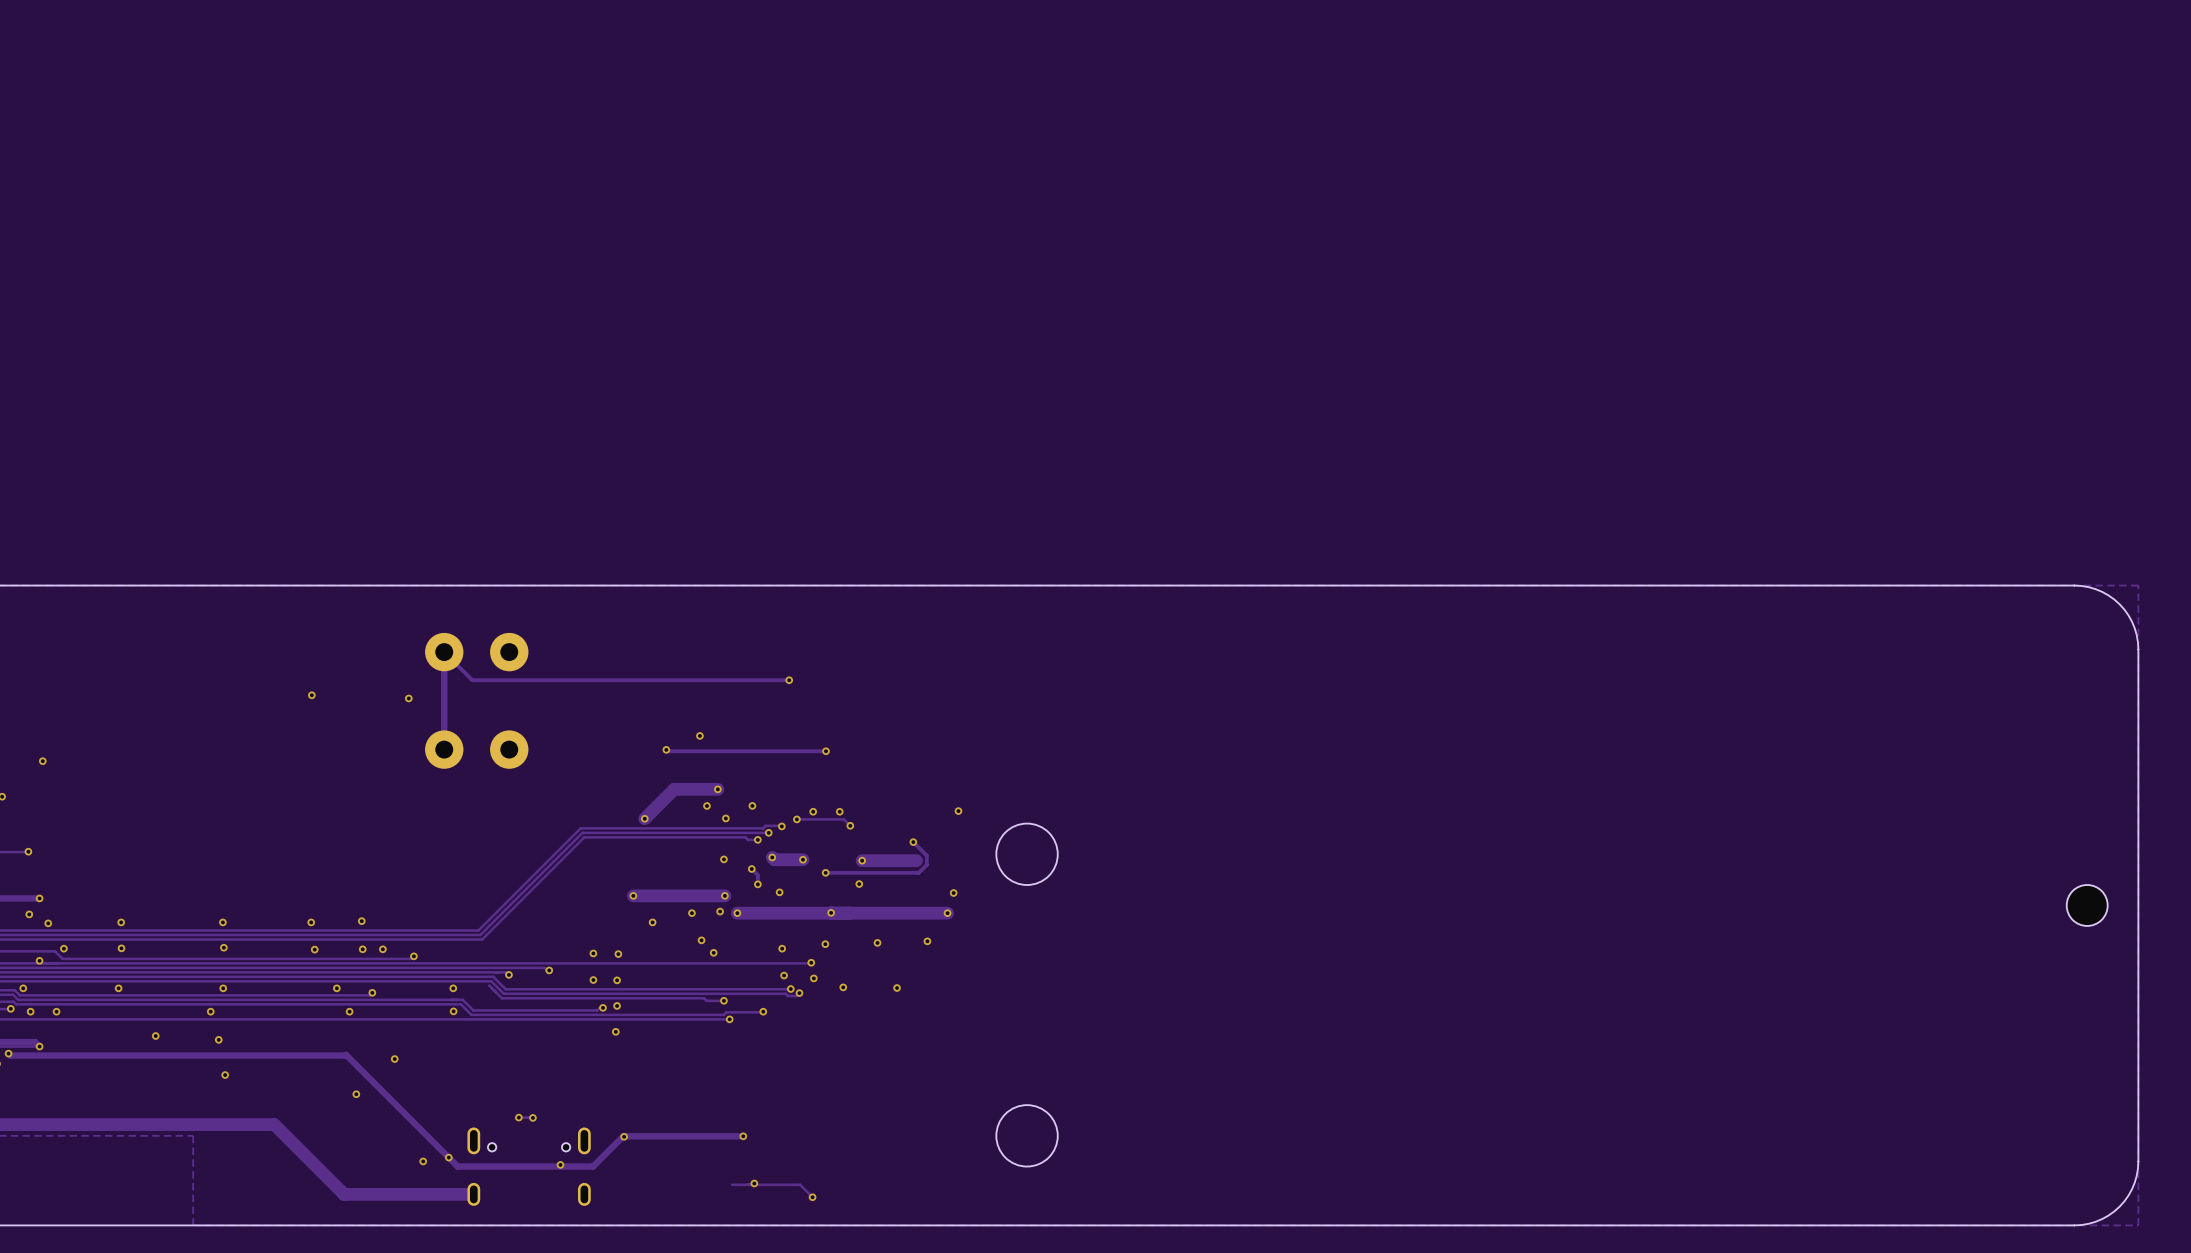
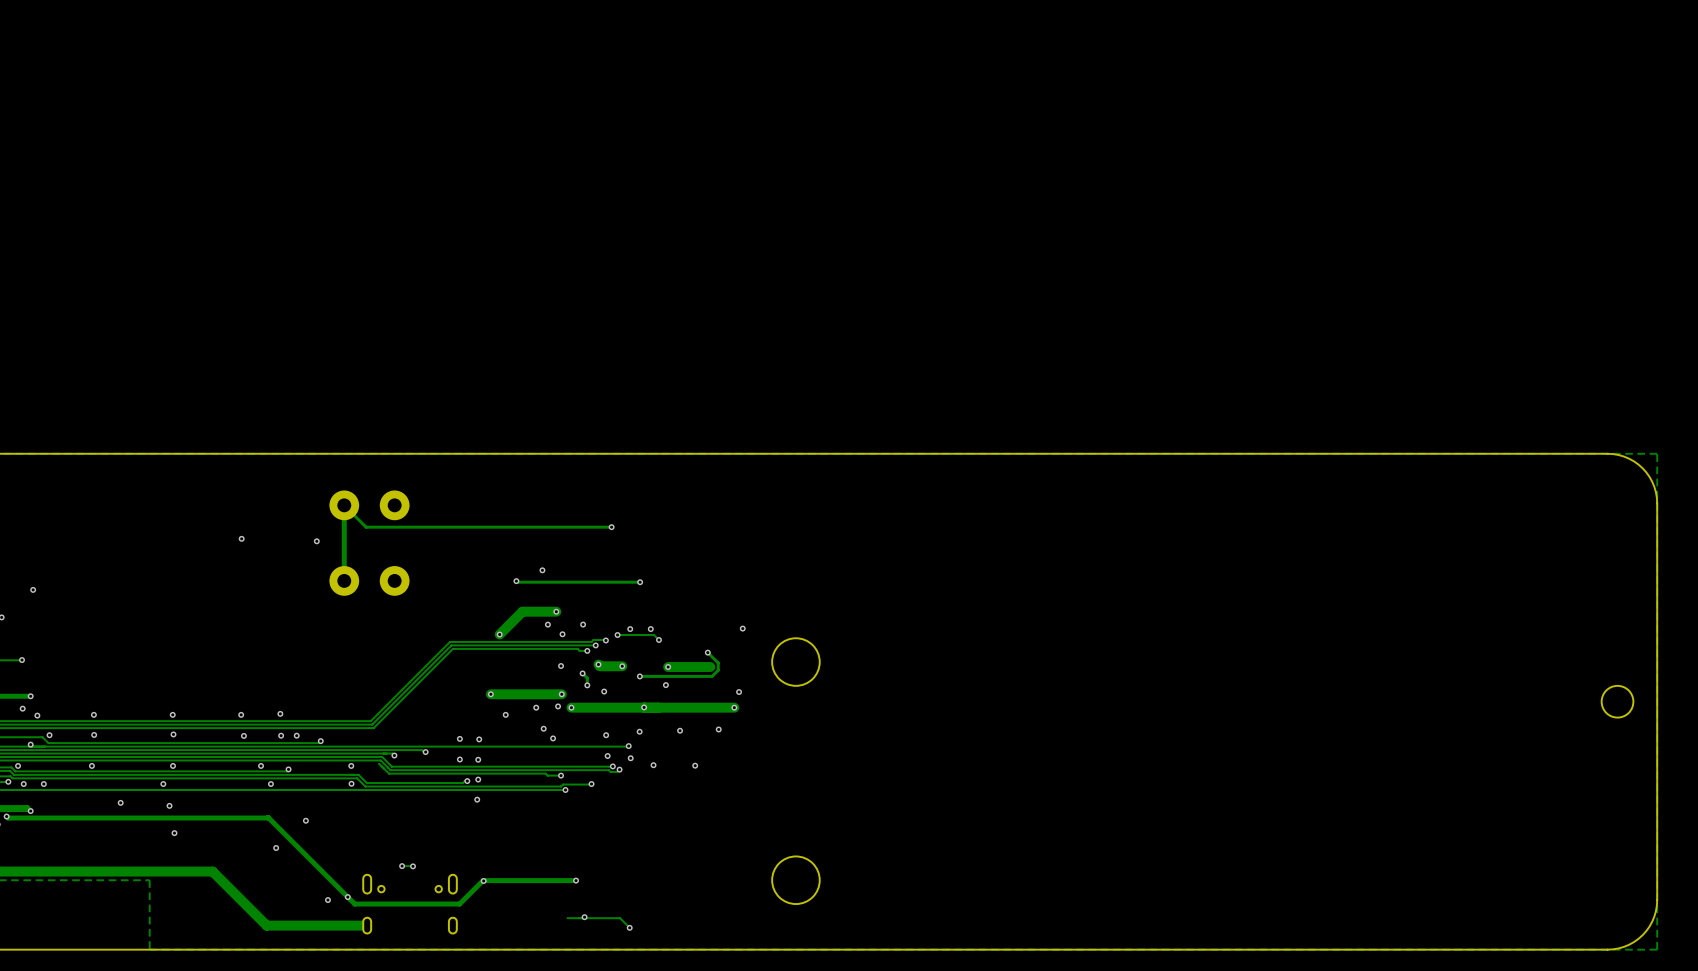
via: (560, 1164) -> none

